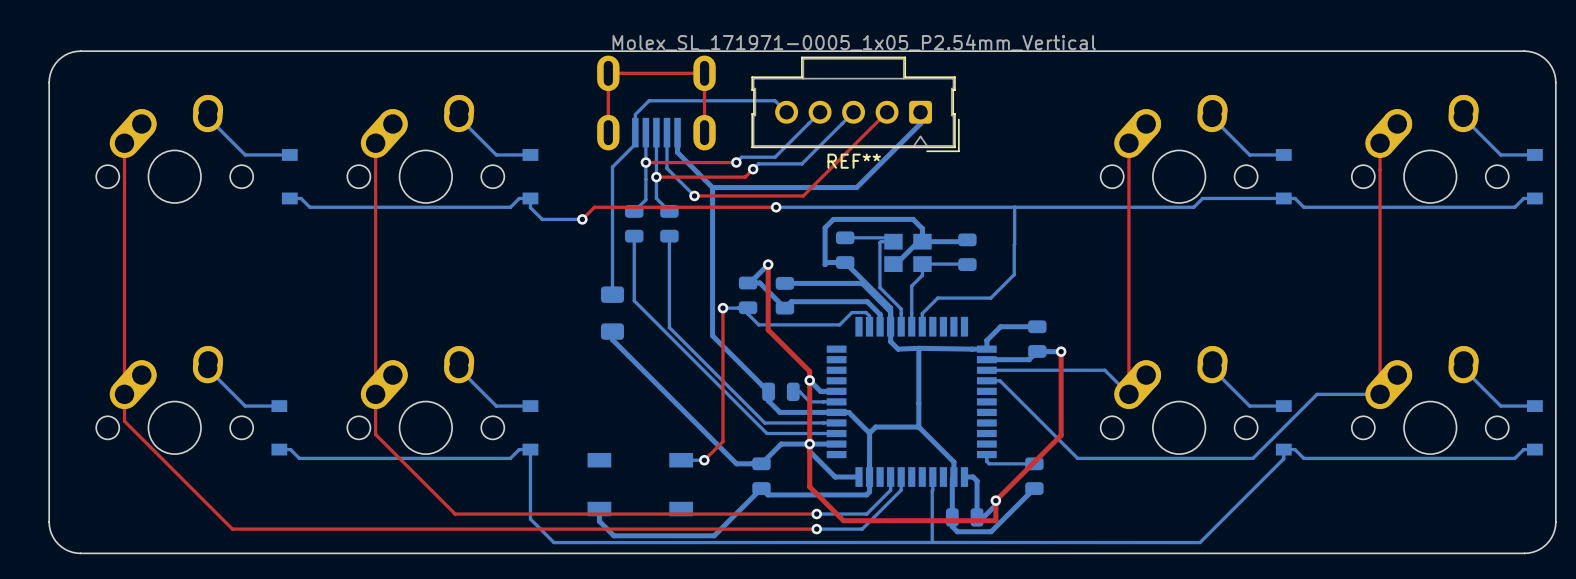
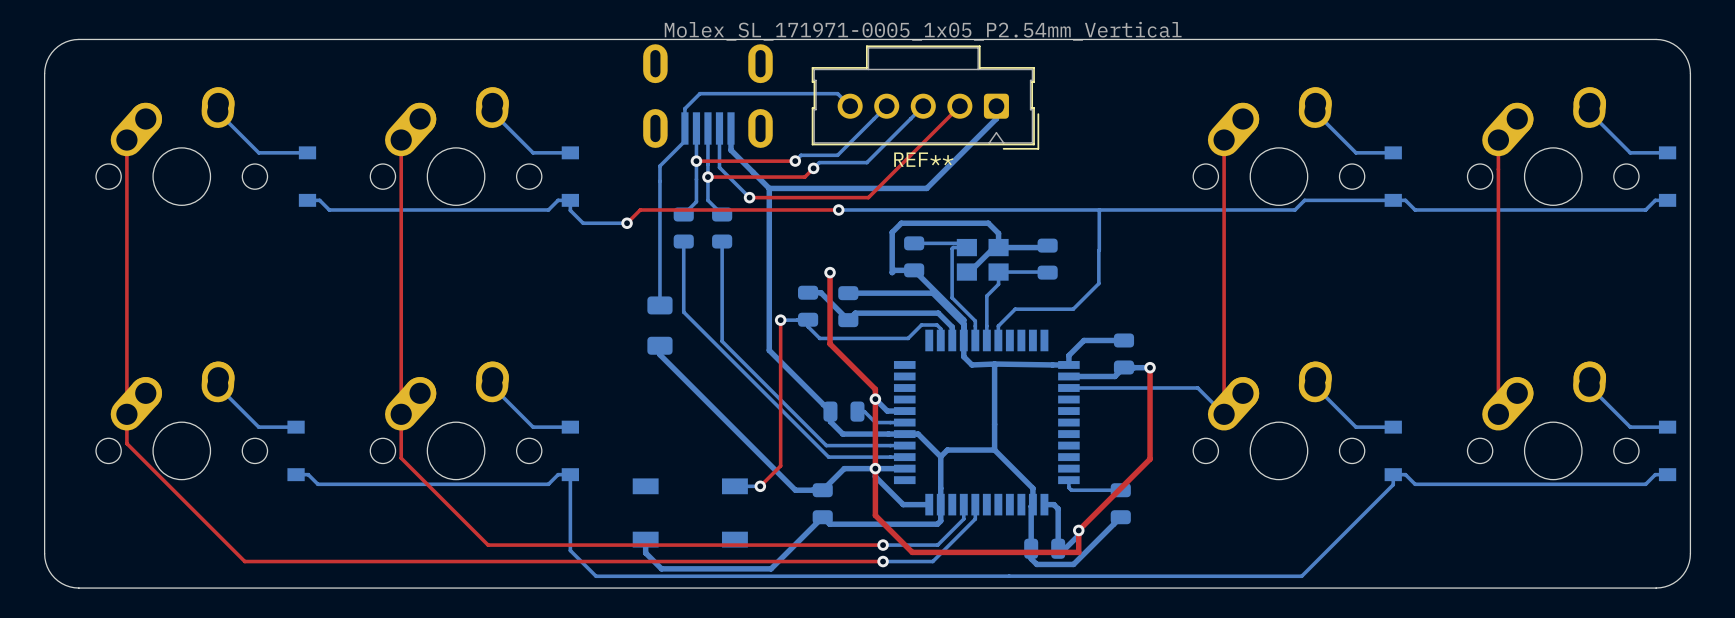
top track: (608, 132) (608, 73) (704, 73) (704, 132) -> none
bottom track: (768, 264) (749, 283) -> none
bottom track: (986, 380) (1000, 380) (1077, 458) (1253, 458) (1317, 394) (1380, 394) -> none
bottom track: (932, 477) (932, 542) -> none

